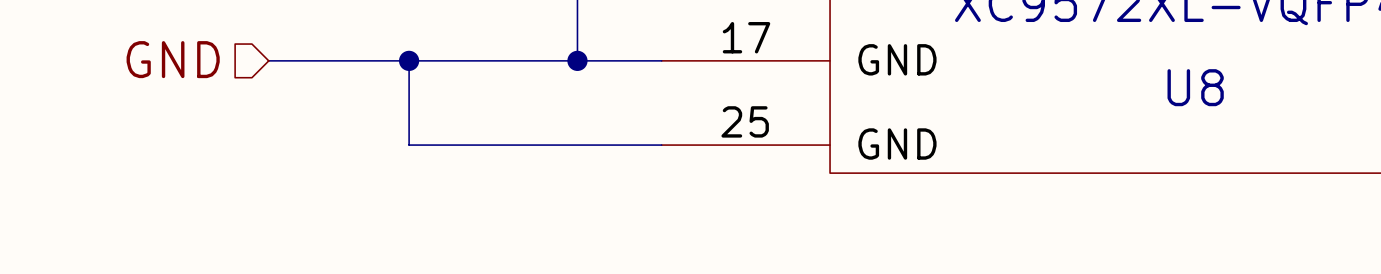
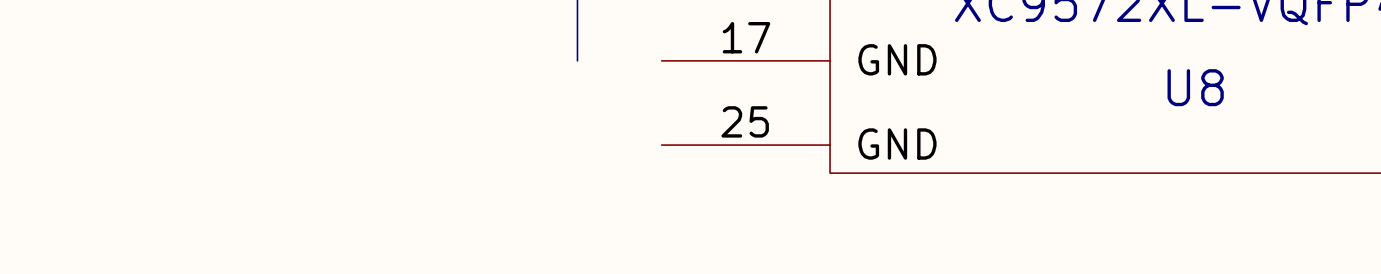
hierarchical label: GND (173, 59) -> none
wire: (268, 60) (661, 60) -> none
wire: (409, 60) (409, 145) (661, 145) -> none
junction: (409, 60) -> none
junction: (577, 60) -> none

